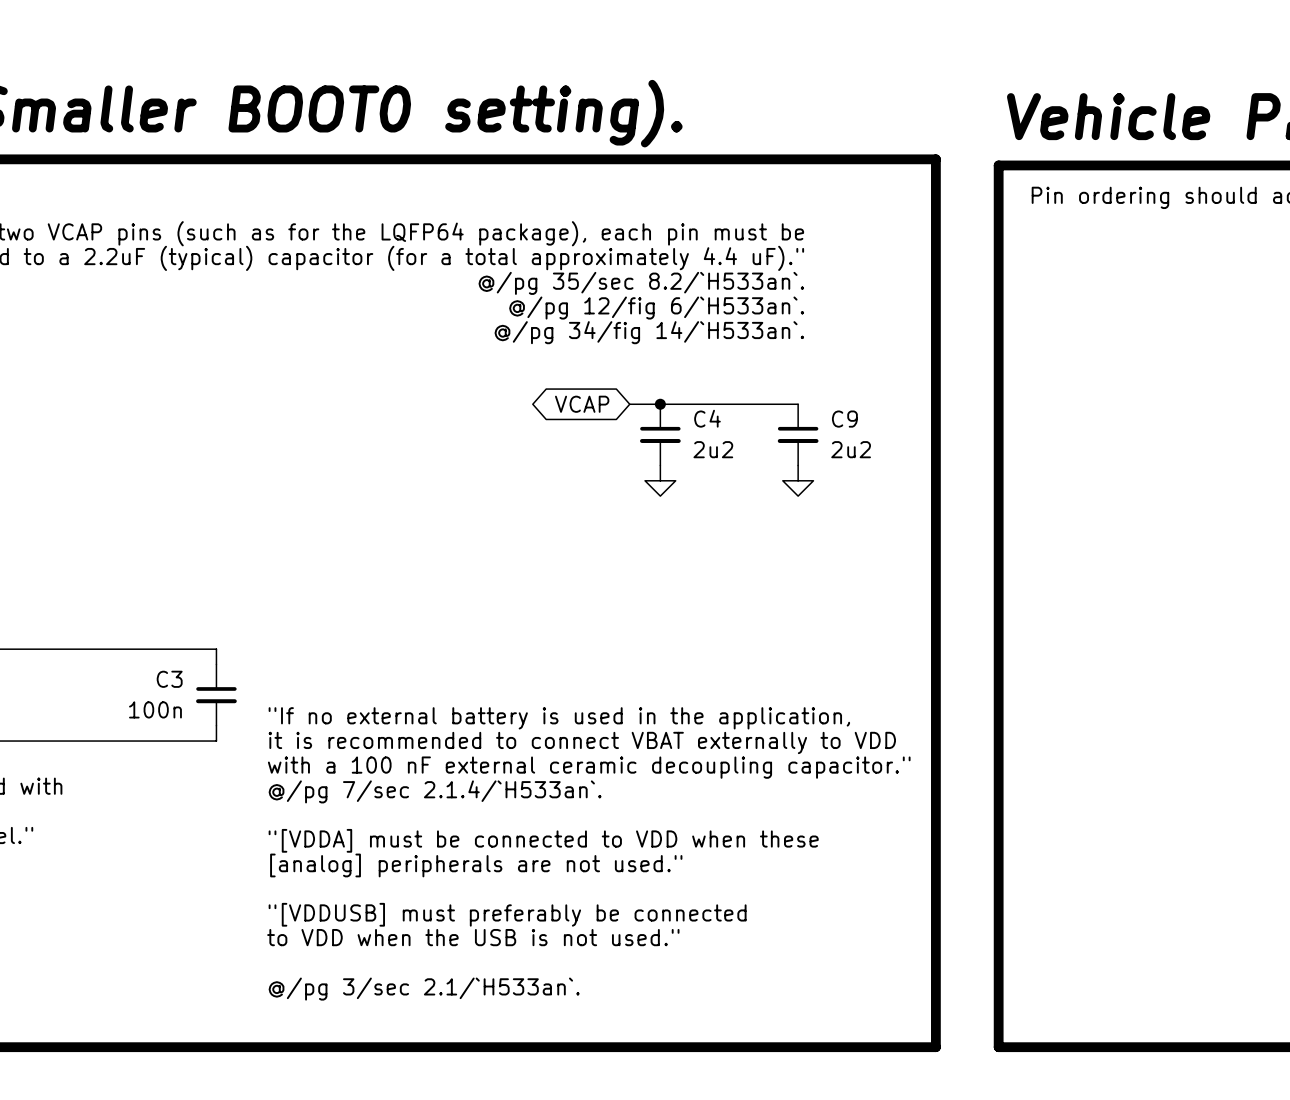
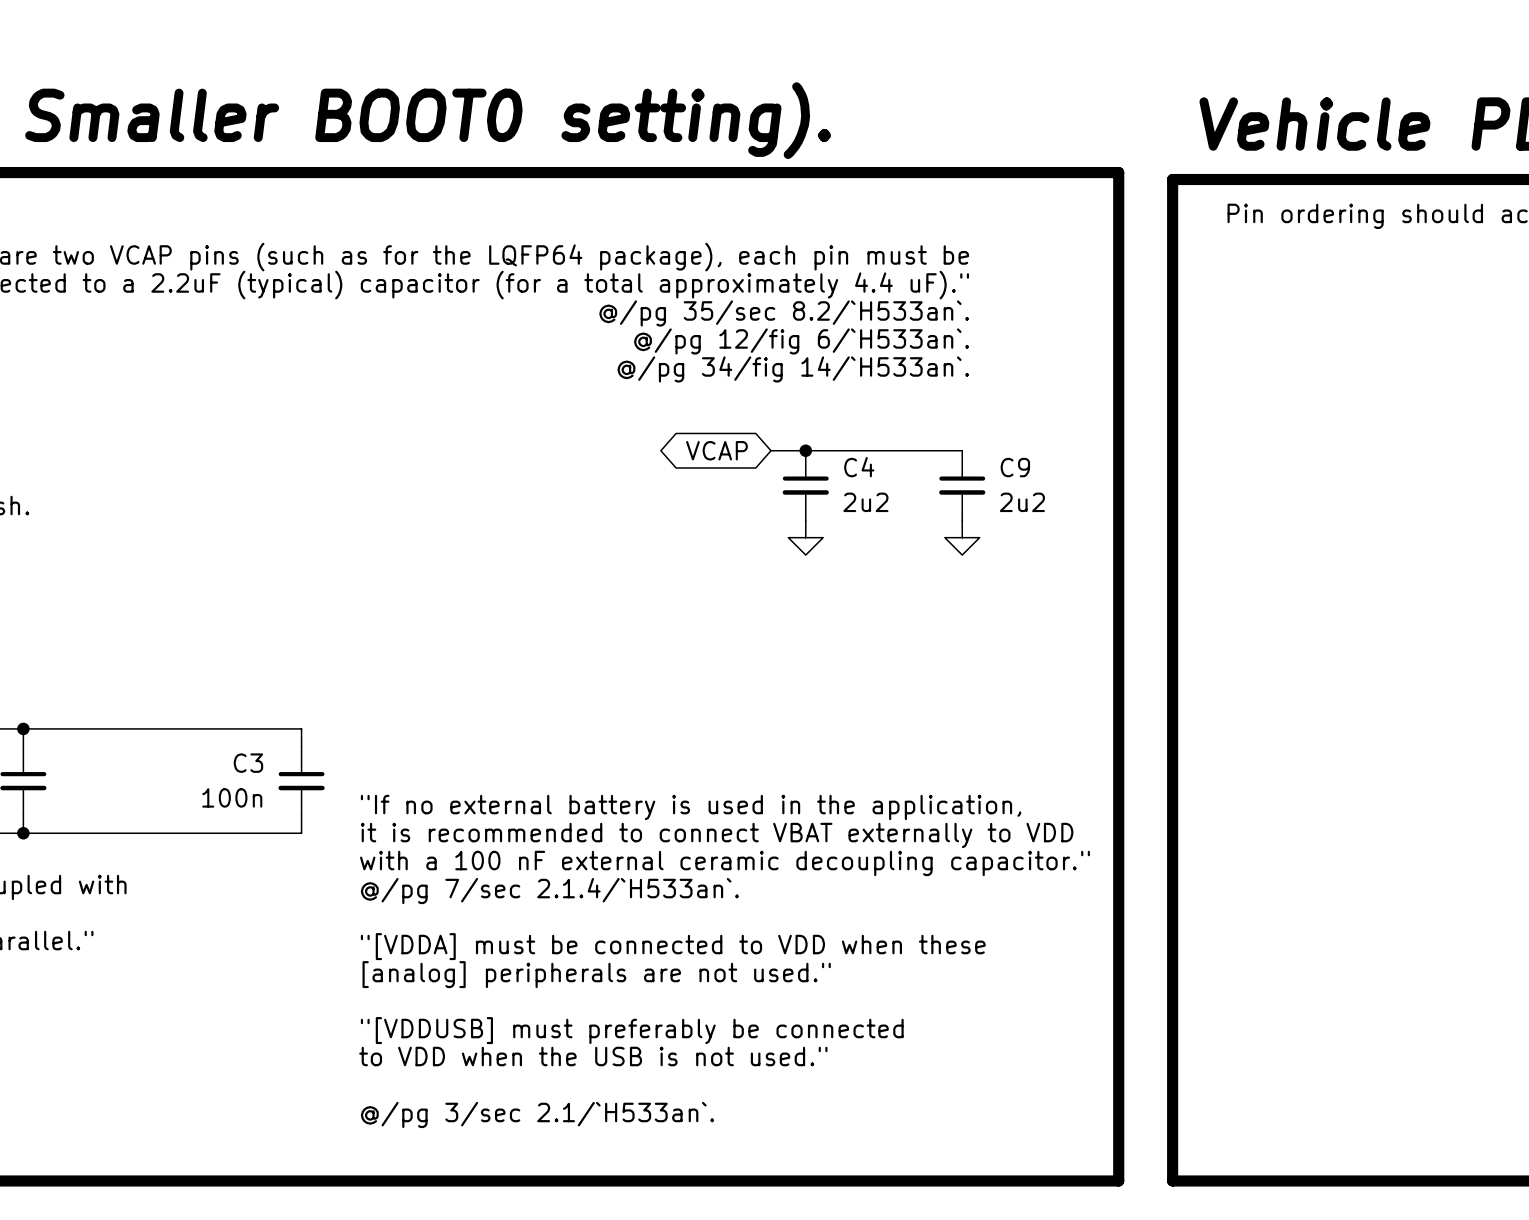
line: (998, 165) (998, 1047) -> (1190, 179) (1172, 179) (1172, 1180) (1190, 1180)

